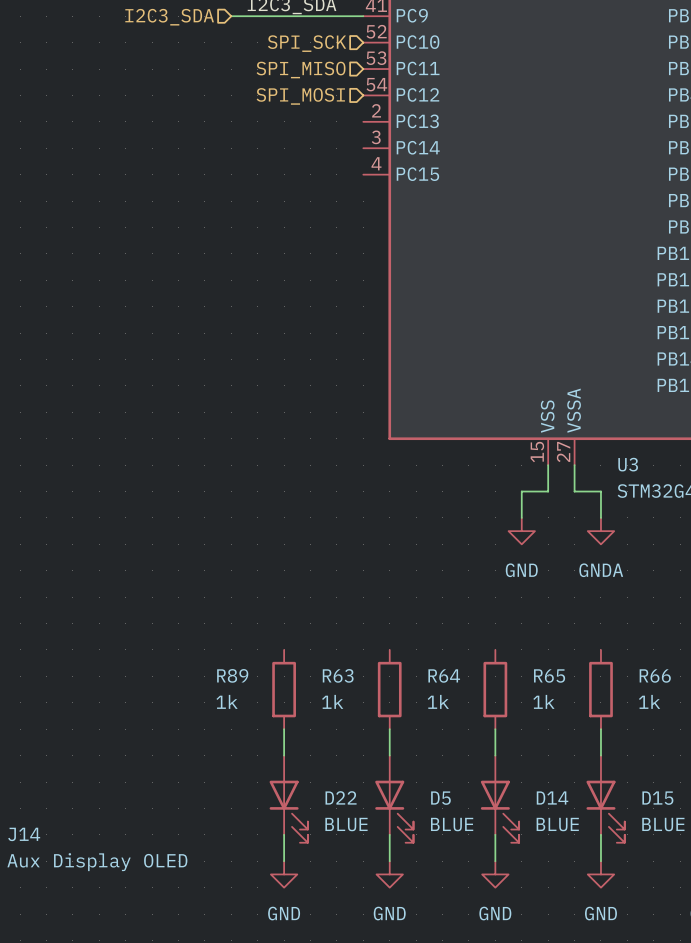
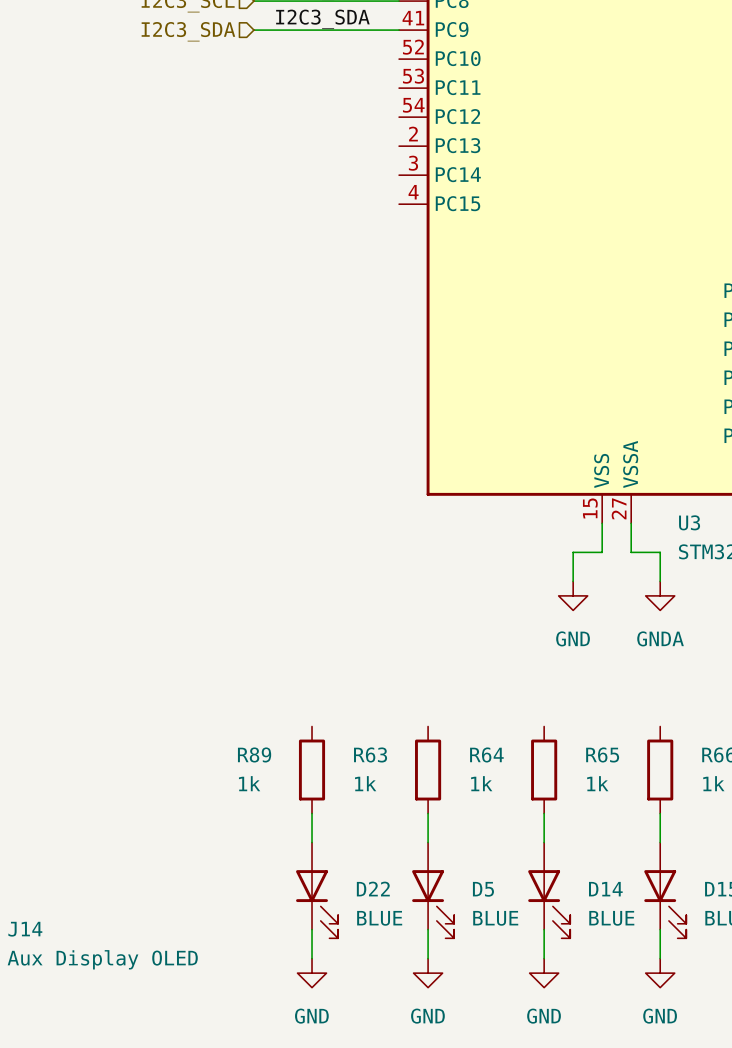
hierarchical label: SPI_SCK (307, 43) -> none
hierarchical label: SPI_MISO (301, 70) -> none
hierarchical label: SPI_MOSI (300, 96) -> none

